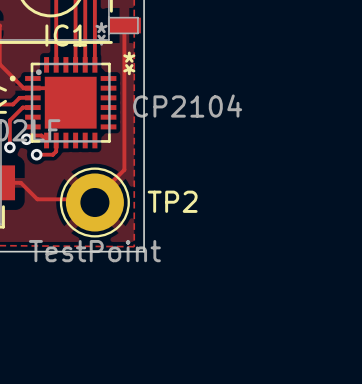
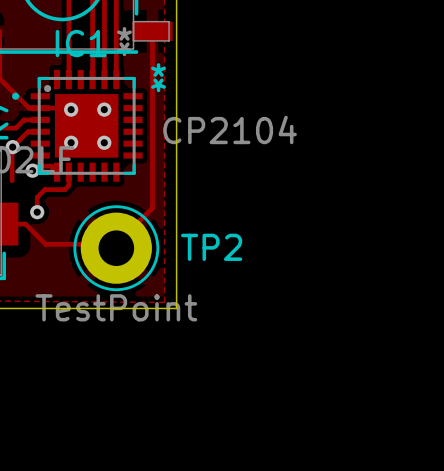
via: none -> (71, 109)
via: none -> (104, 109)
via: none -> (71, 142)
via: none -> (104, 142)
via: none -> (12, 147)
via: (9, 147) -> none
track: none -> (44, 189) (37, 197) (37, 214)
via: (36, 154) -> none
via: none -> (37, 212)

